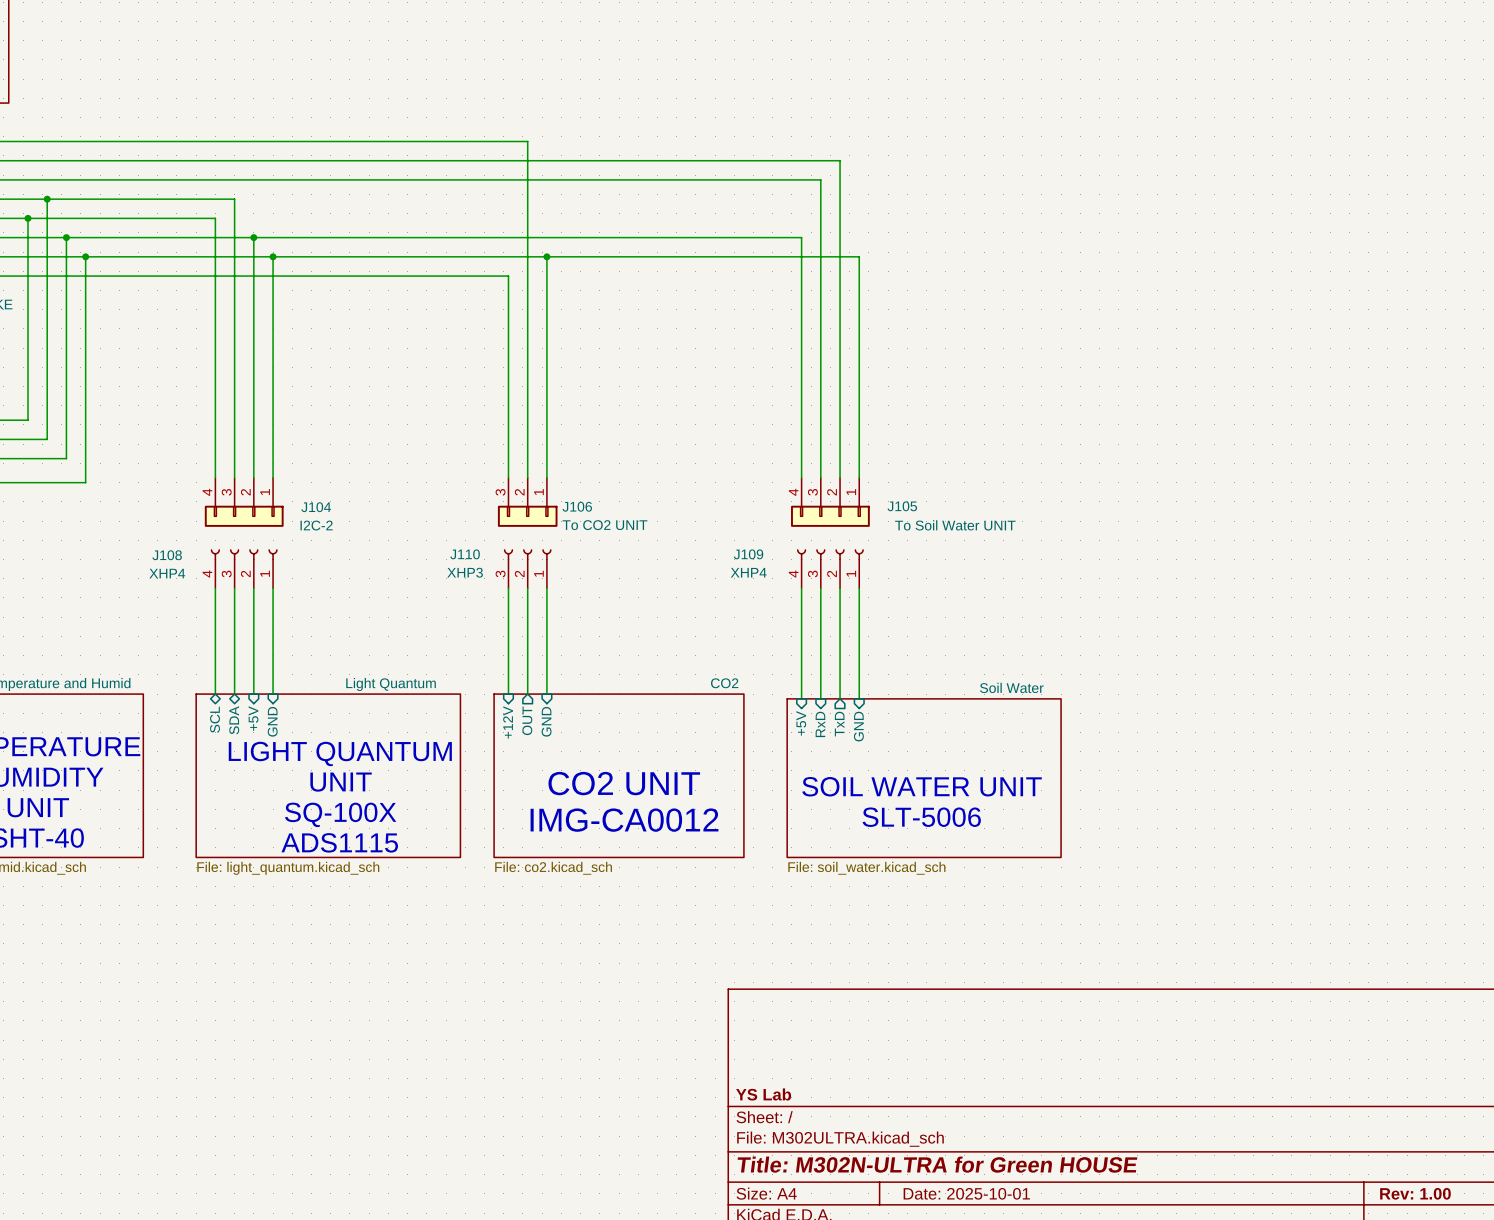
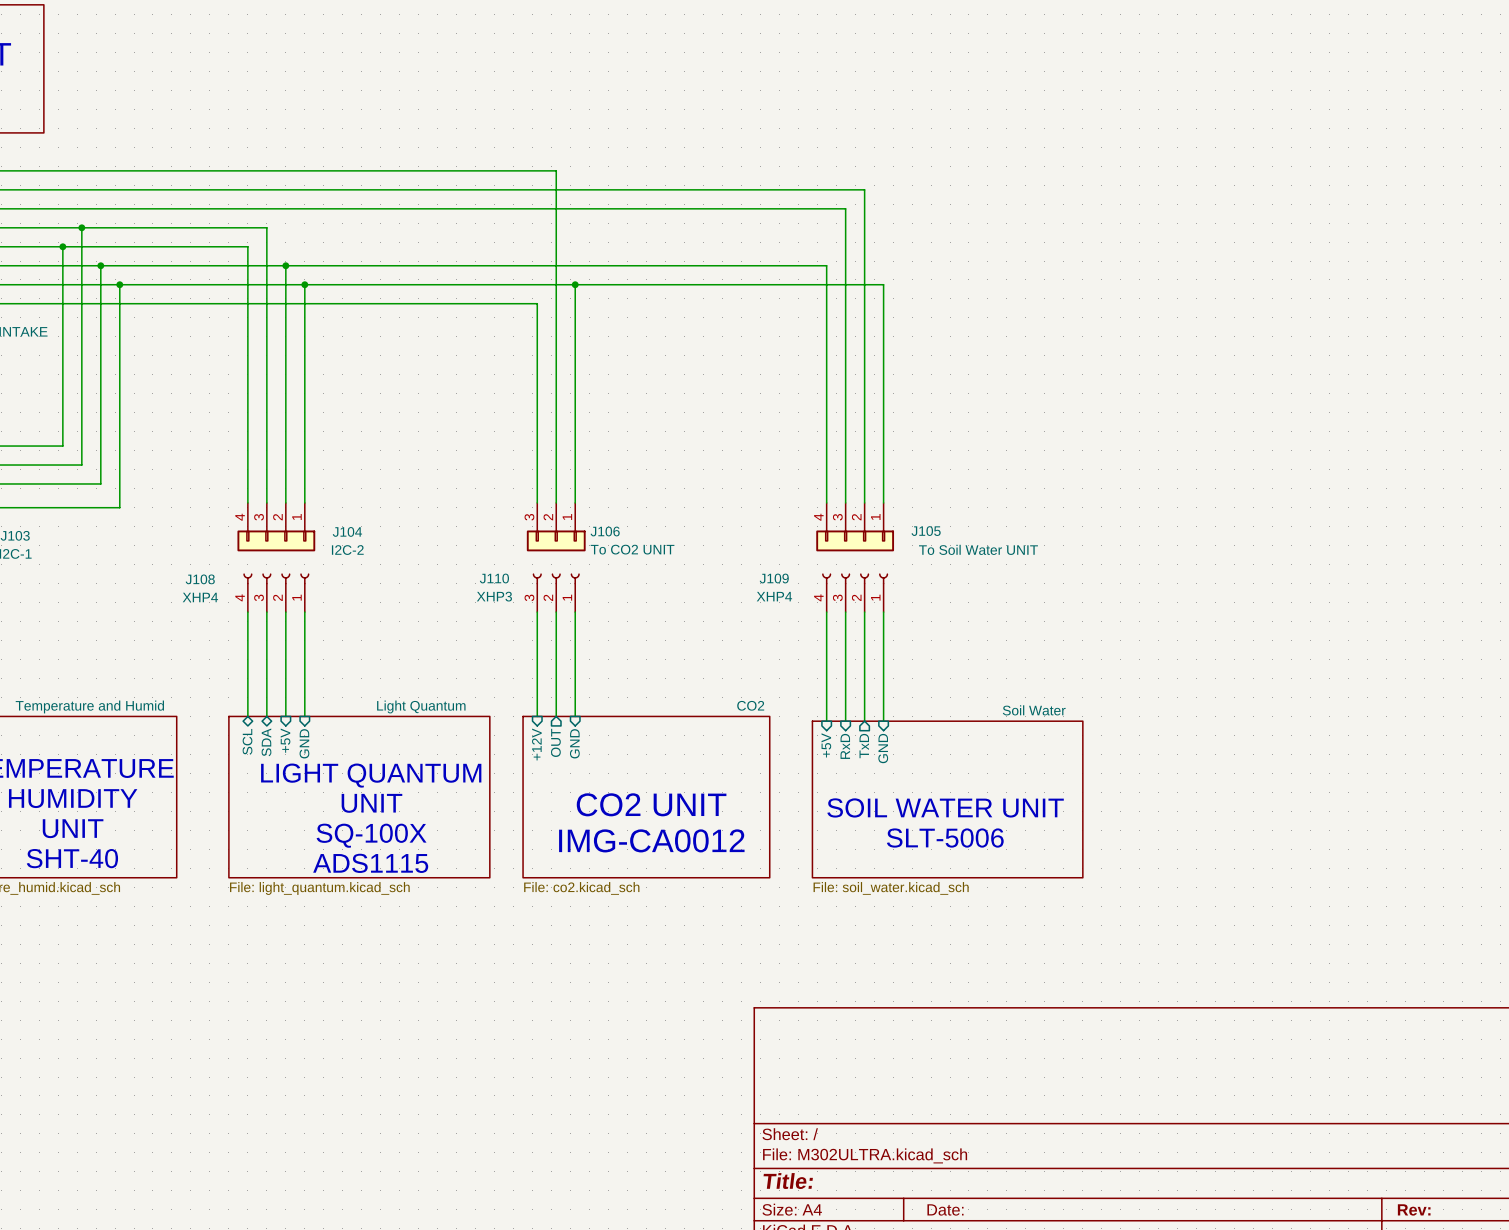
title block: YS Lab (763, 1094) -> none
title block: Title: M302N-ULTRA for Green HOUSE (937, 1164) -> Title: (788, 1181)
title block: Date: 2025-10-01 (966, 1193) -> Date: (945, 1209)
title block: Rev: 1.00 (1415, 1193) -> Rev: (1414, 1209)

